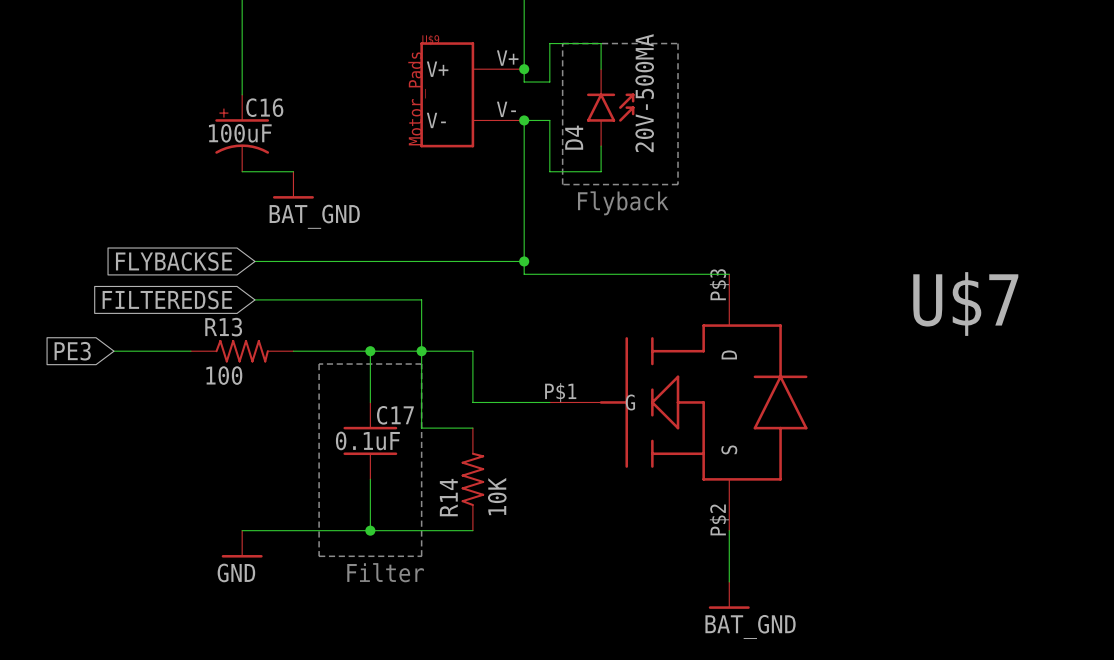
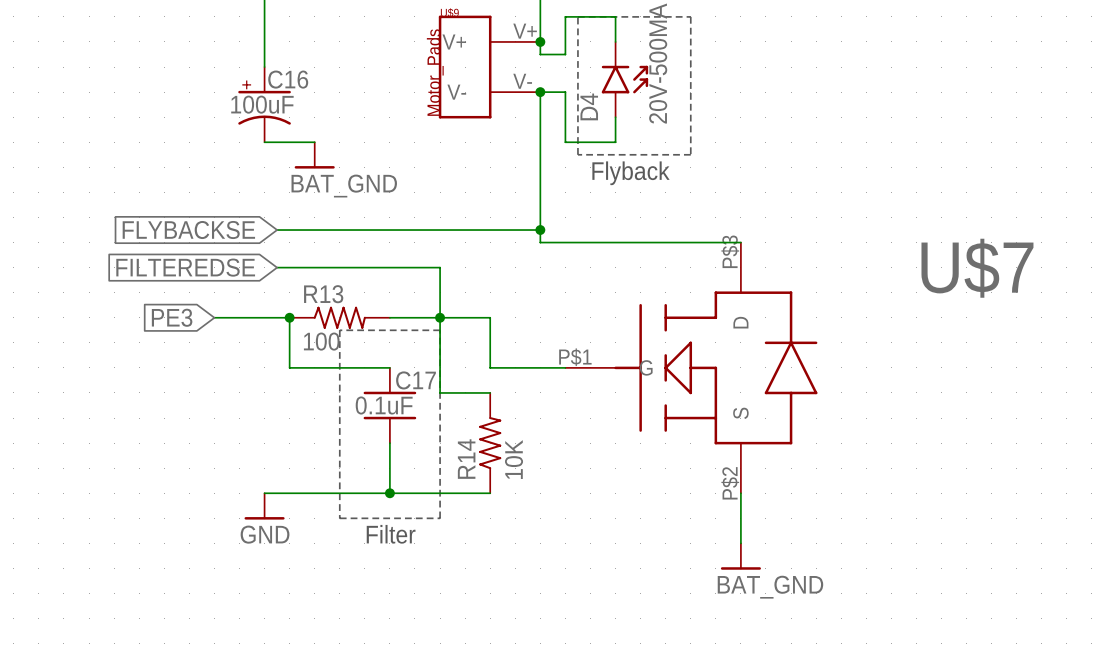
global label position: PE3 (72, 351) -> PE3 (172, 317)
wire: (113, 351) (190, 351) -> none
R13 position: (242, 351) -> (339, 317)
junction: none -> (289, 317)
wire: (293, 351) (370, 351) (370, 402) -> (214, 317) (289, 317) (289, 367) (389, 367)
junction: (370, 351) -> none

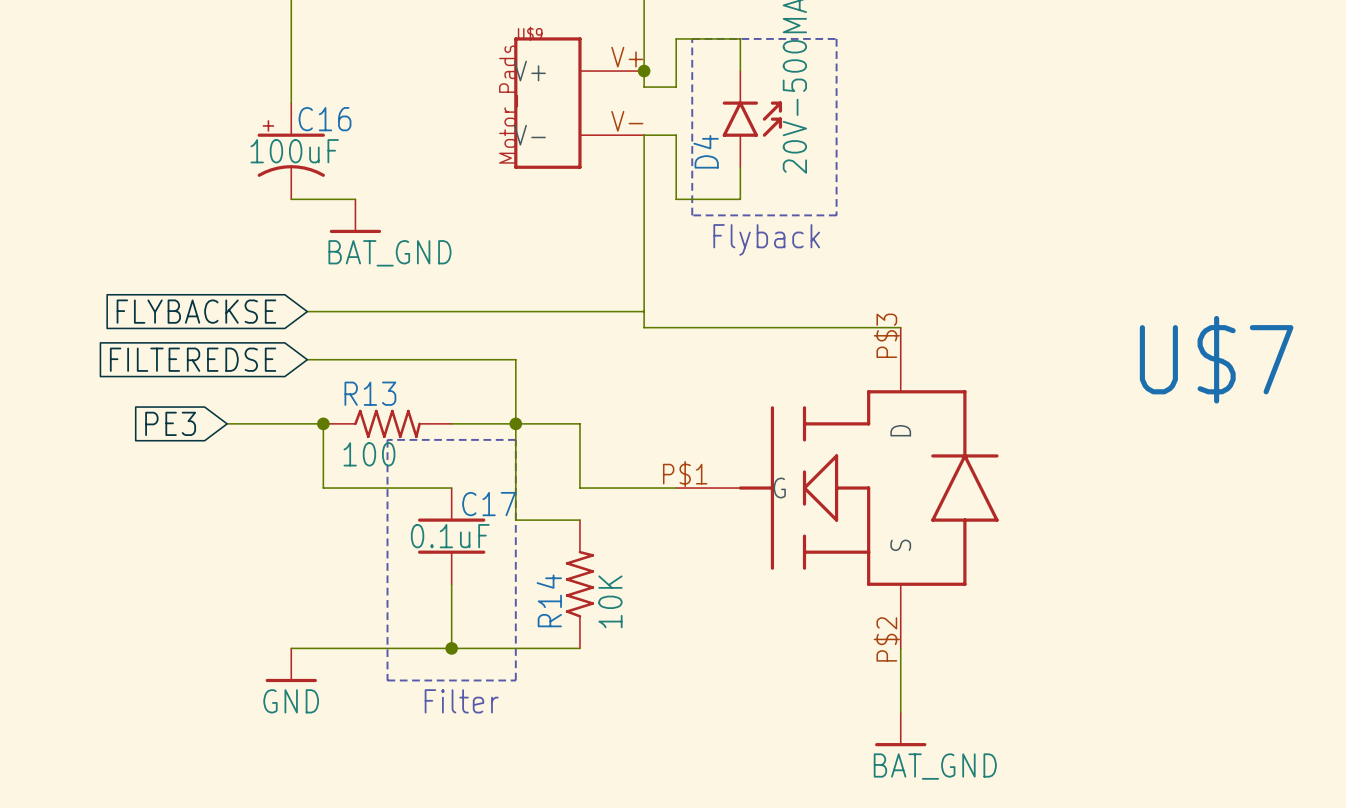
junction: (540, 92) -> none
junction: (540, 230) -> none

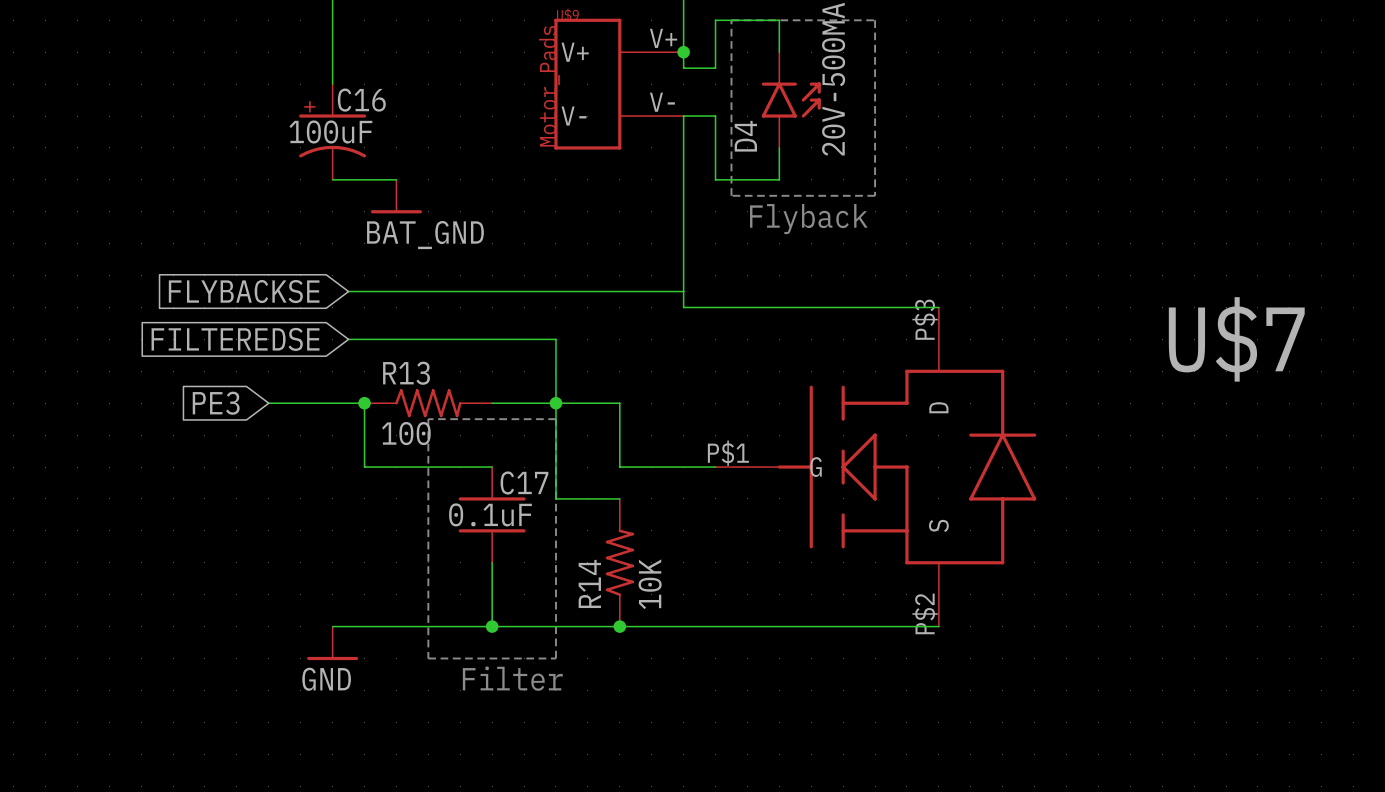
junction: none -> (619, 626)
wire: (900, 648) (900, 712) -> (938, 626) (619, 626)
power symbol: BAT_GND (900, 729) -> none

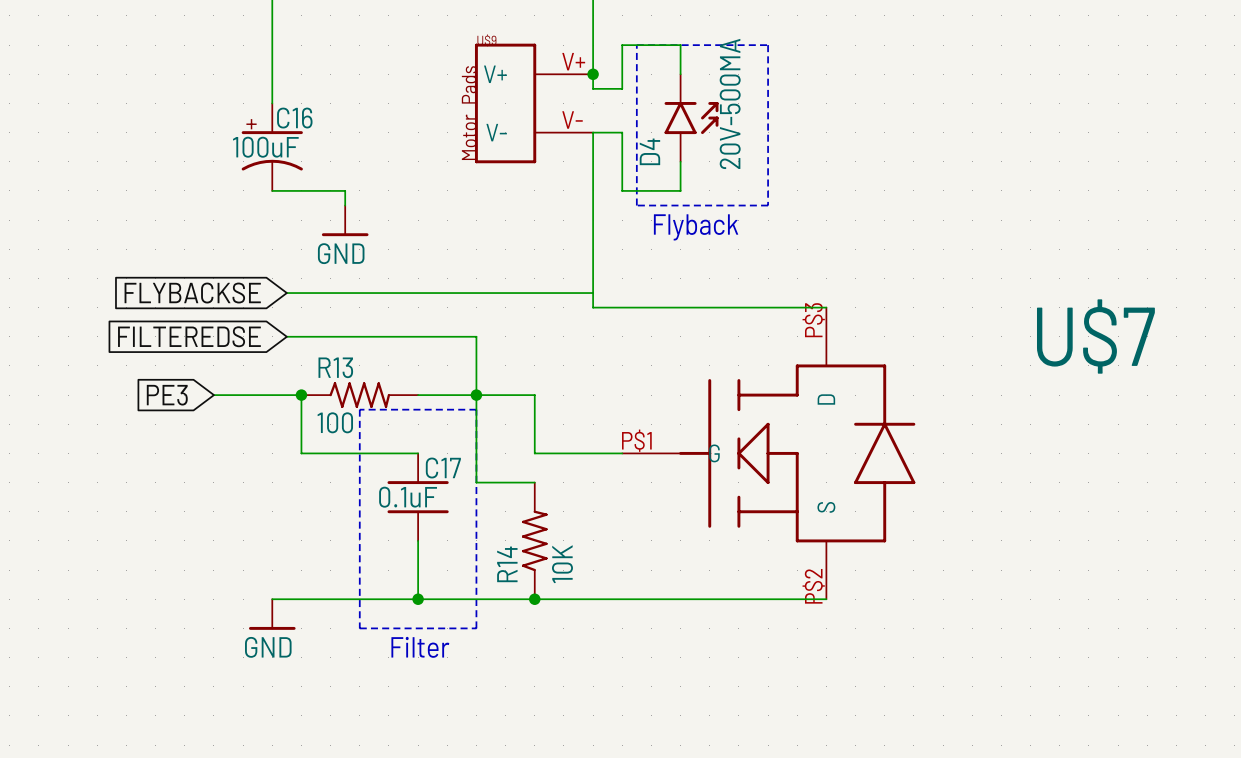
wire: none -> (330, 190) (345, 190) (345, 205)
power symbol: BAT_GND (396, 196) -> none
power symbol: none -> GND (345, 220)

